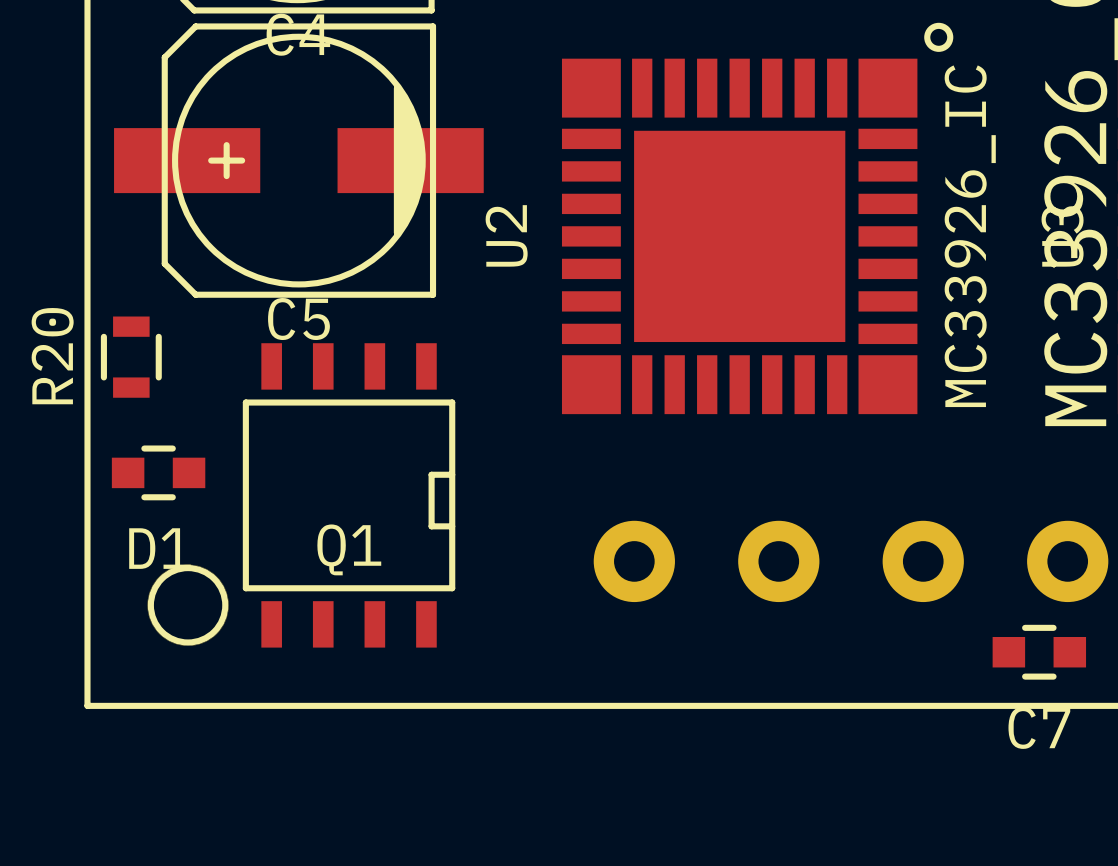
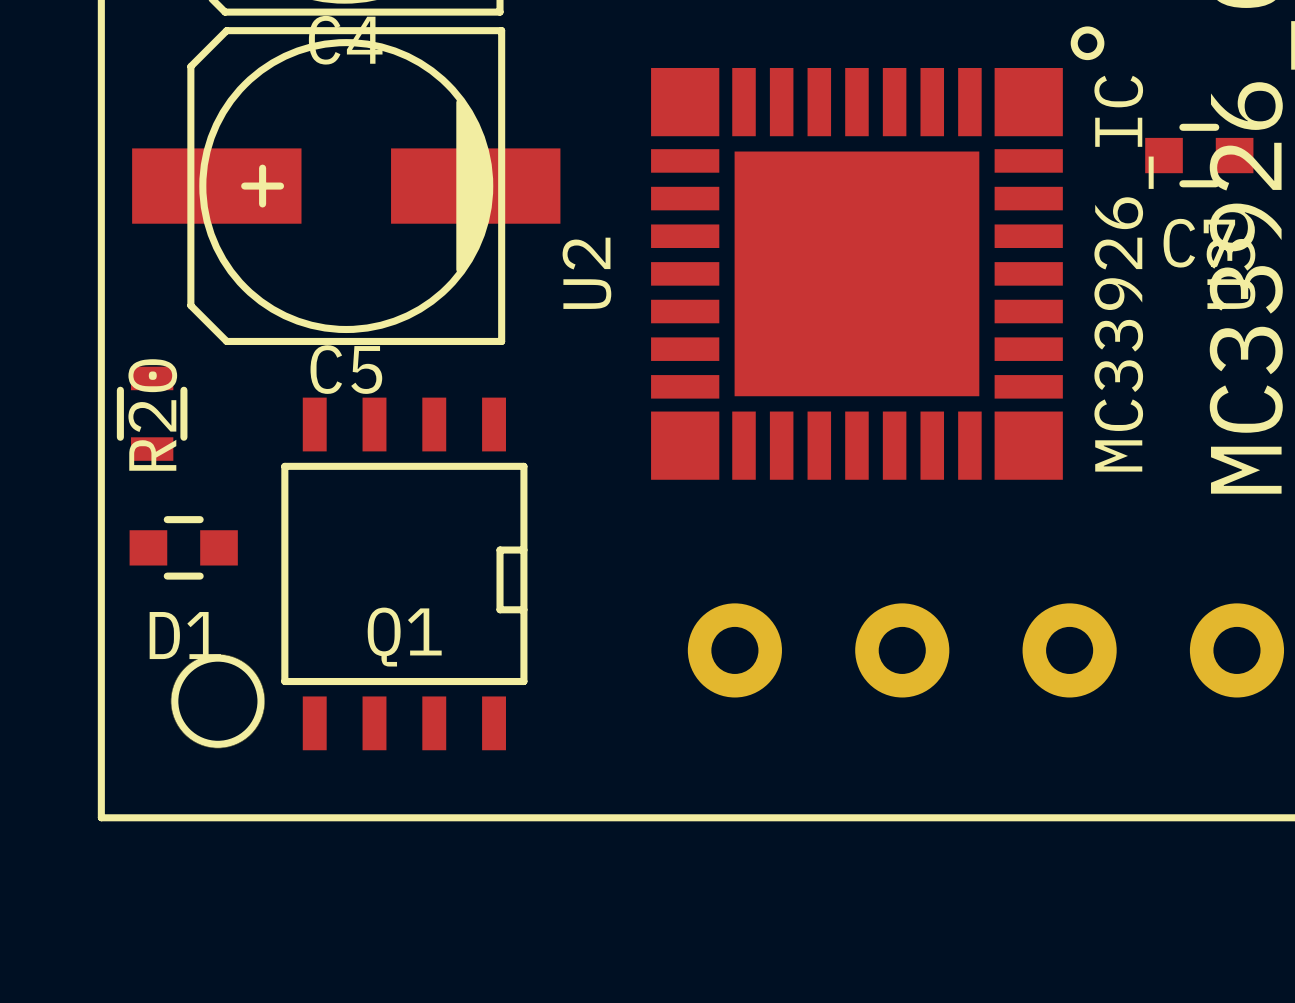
R20 name position: R20 (52, 356) -> R20 (152, 414)
C7 position: (1039, 652) -> (1199, 155)

